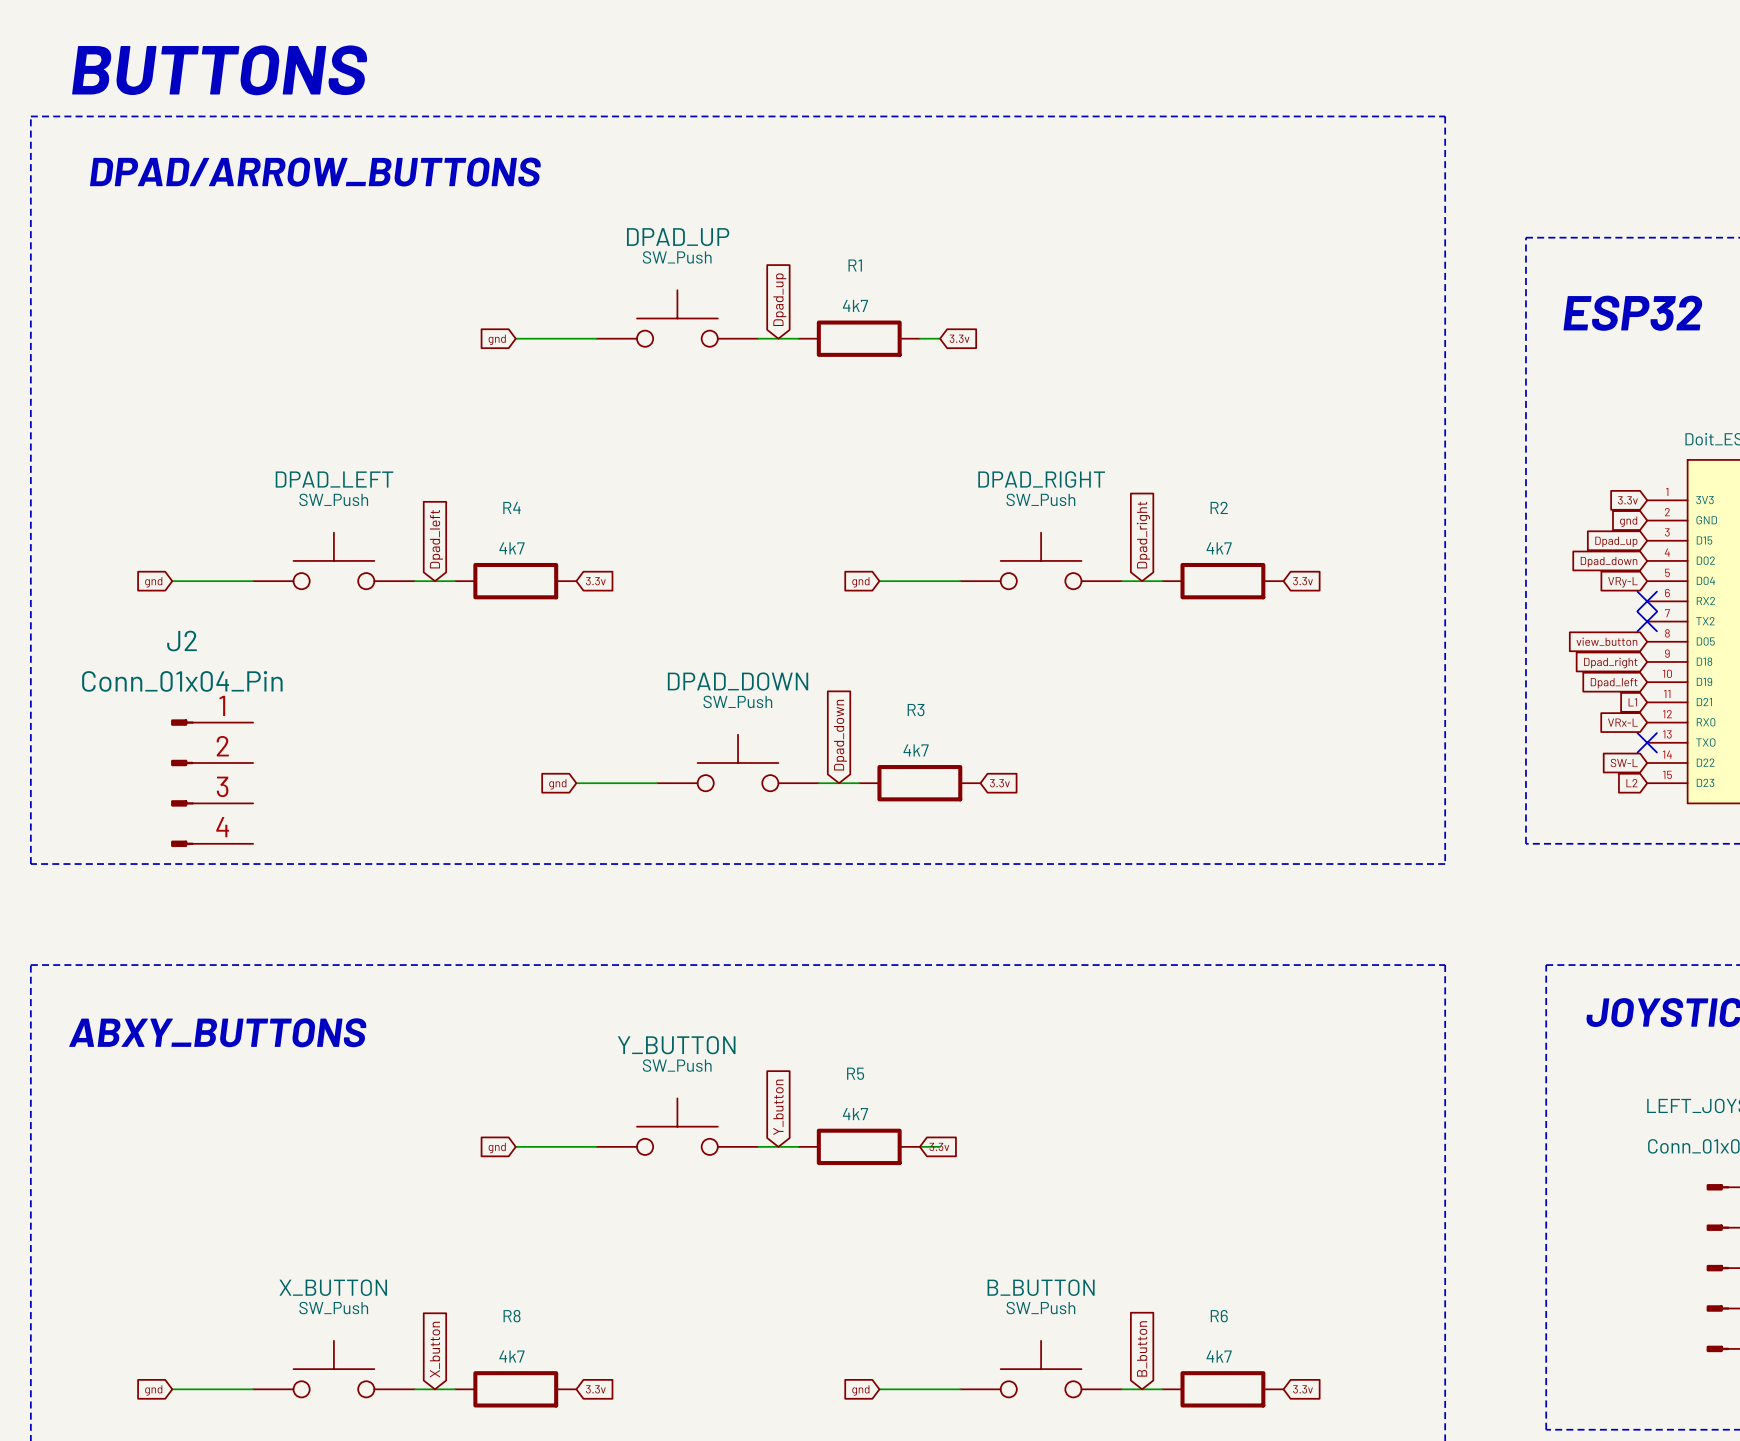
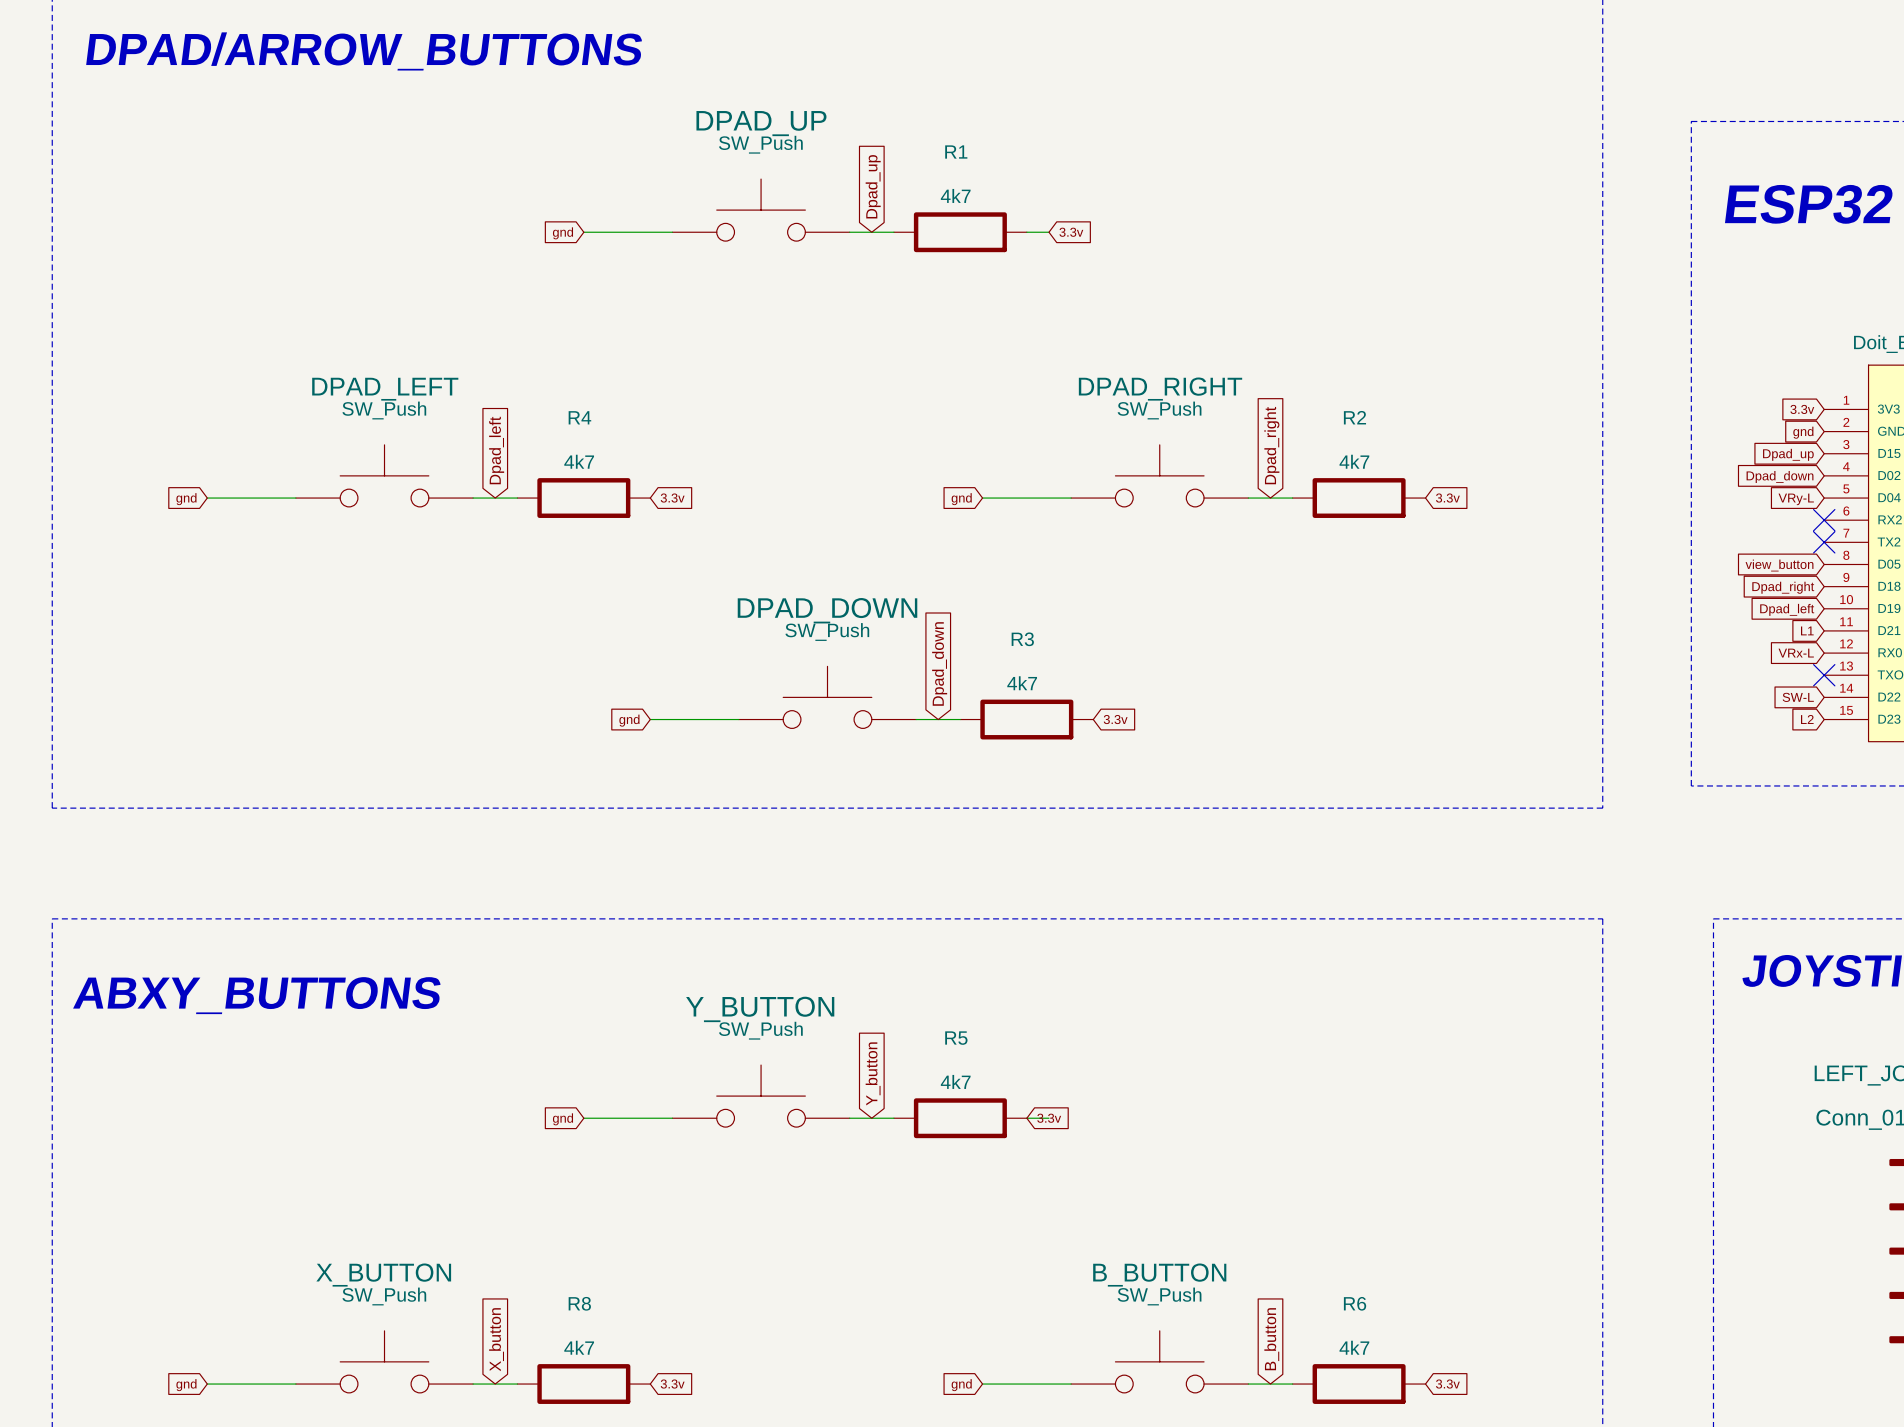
J2: Conn_01x04_Pin (212, 783) -> none

